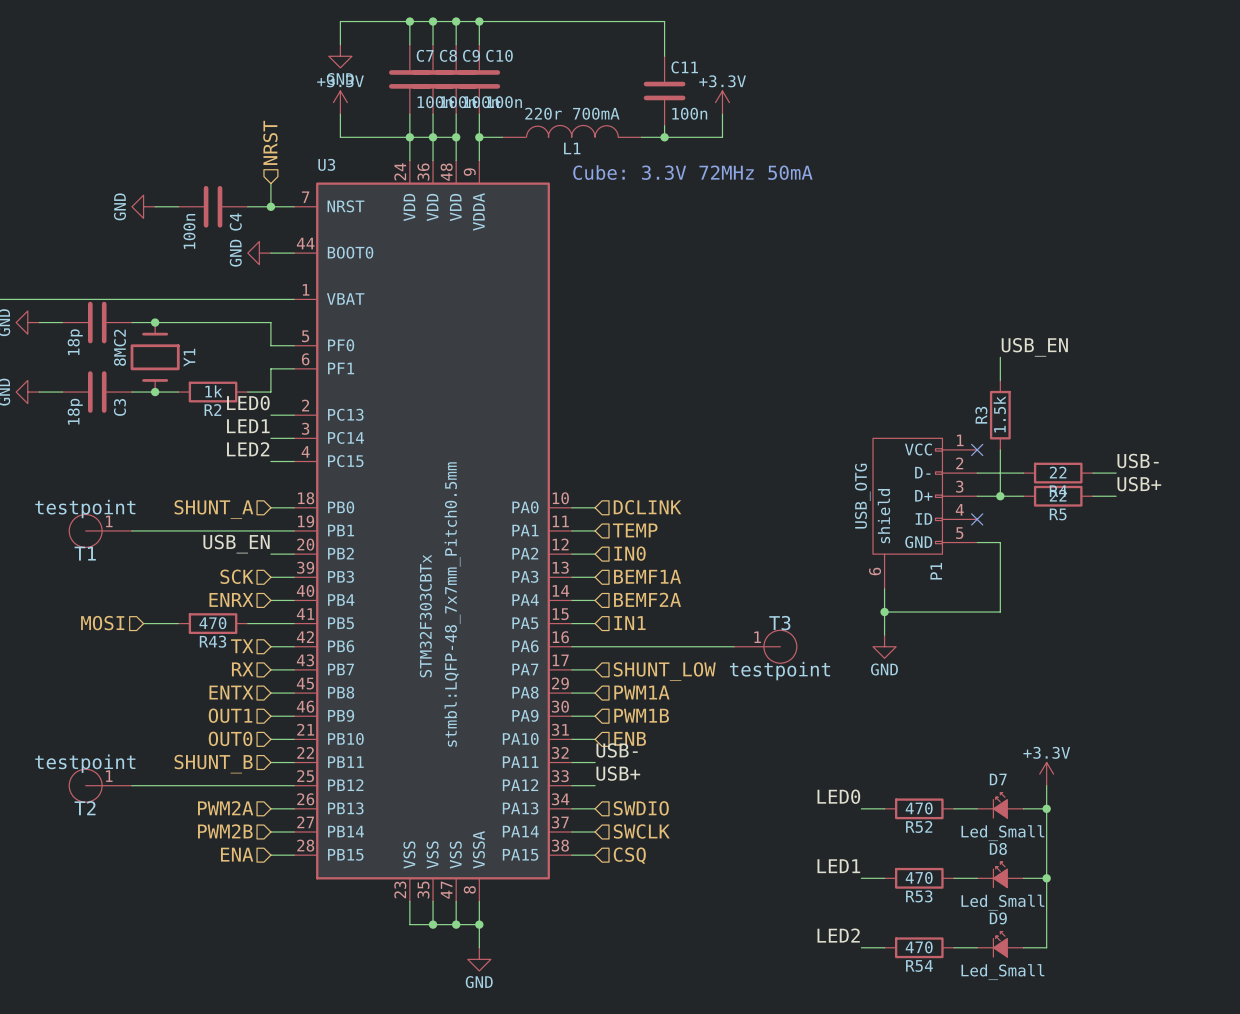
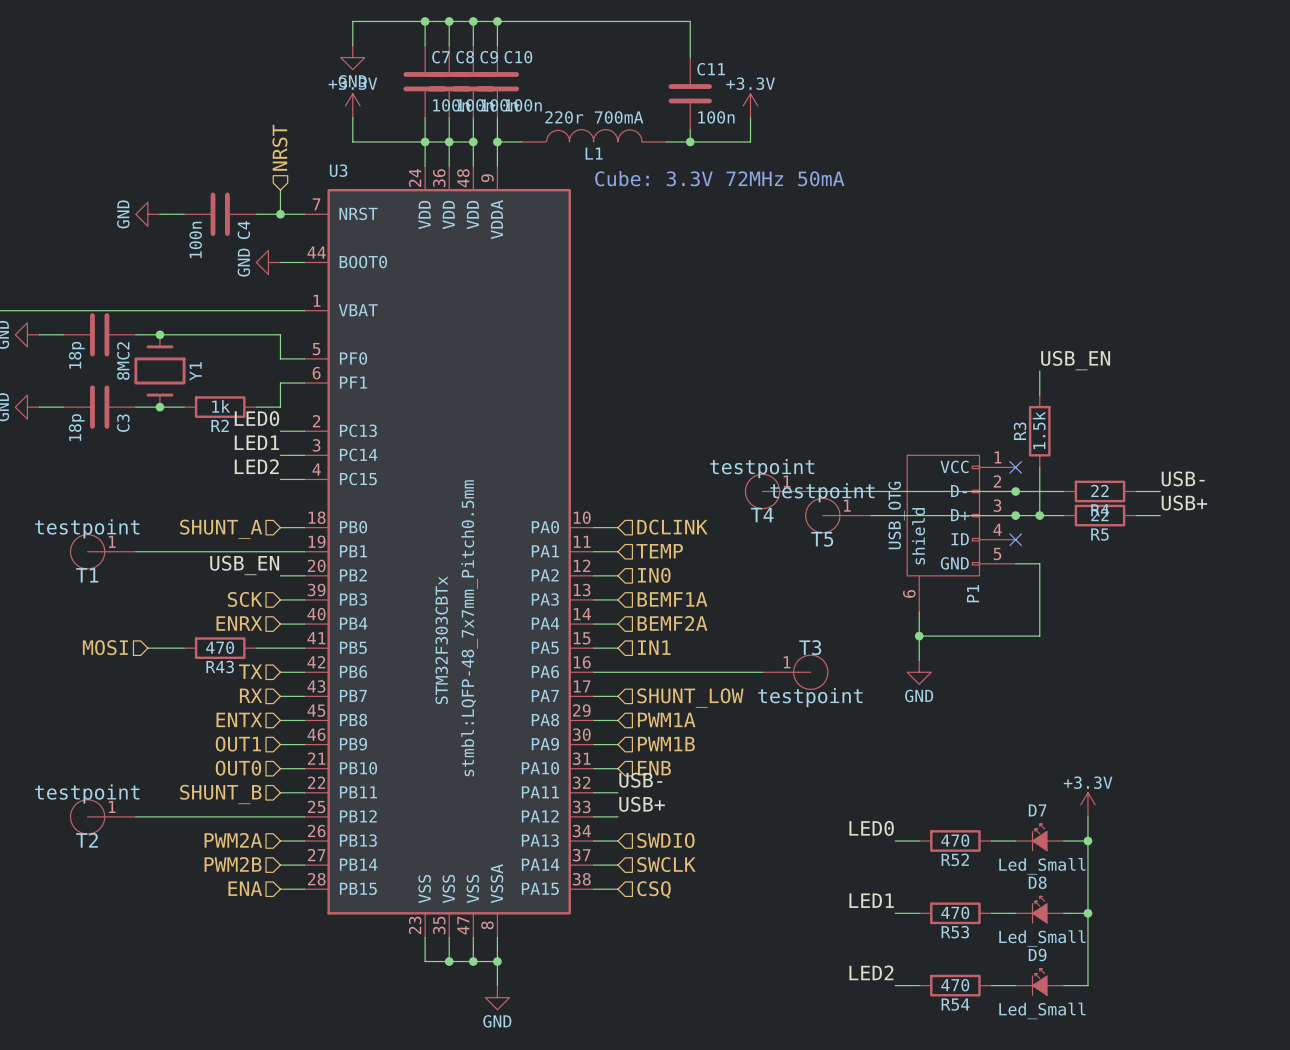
T4: none -> testpoint (778, 491)
wire: none -> (810, 491) (1015, 491)
junction: none -> (1015, 491)
T5: none -> testpoint (838, 515)
wire: none -> (871, 515) (1015, 515)
junction: none -> (1015, 515)

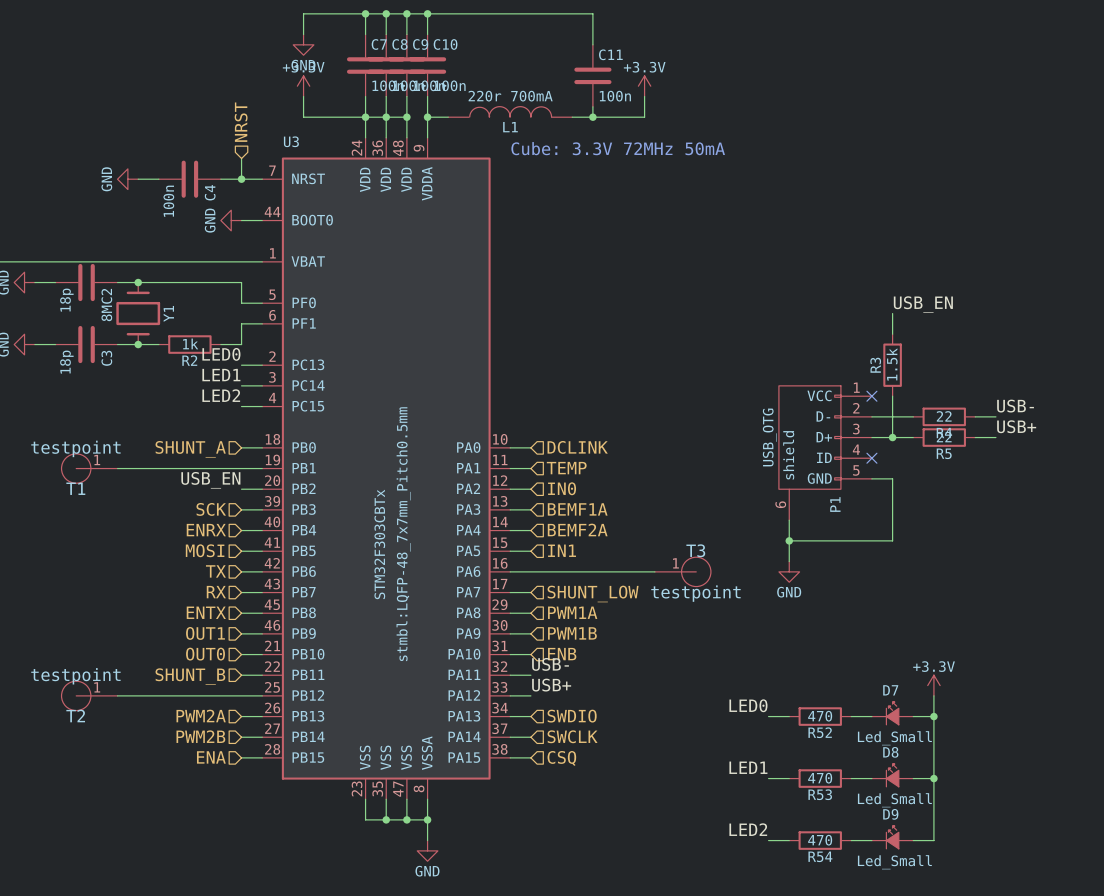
T4: testpoint (778, 491) -> none
wire: (810, 491) (1015, 491) -> none
junction: (1015, 491) -> none
T5: testpoint (838, 515) -> none
wire: (871, 515) (1015, 515) -> none
junction: (1015, 515) -> none
hierarchical label position: MOSI (105, 647) -> MOSI (205, 550)
wire: (147, 648) (184, 648) -> none
R43: 470 (220, 648) -> none
wire: (256, 648) (280, 648) -> none

